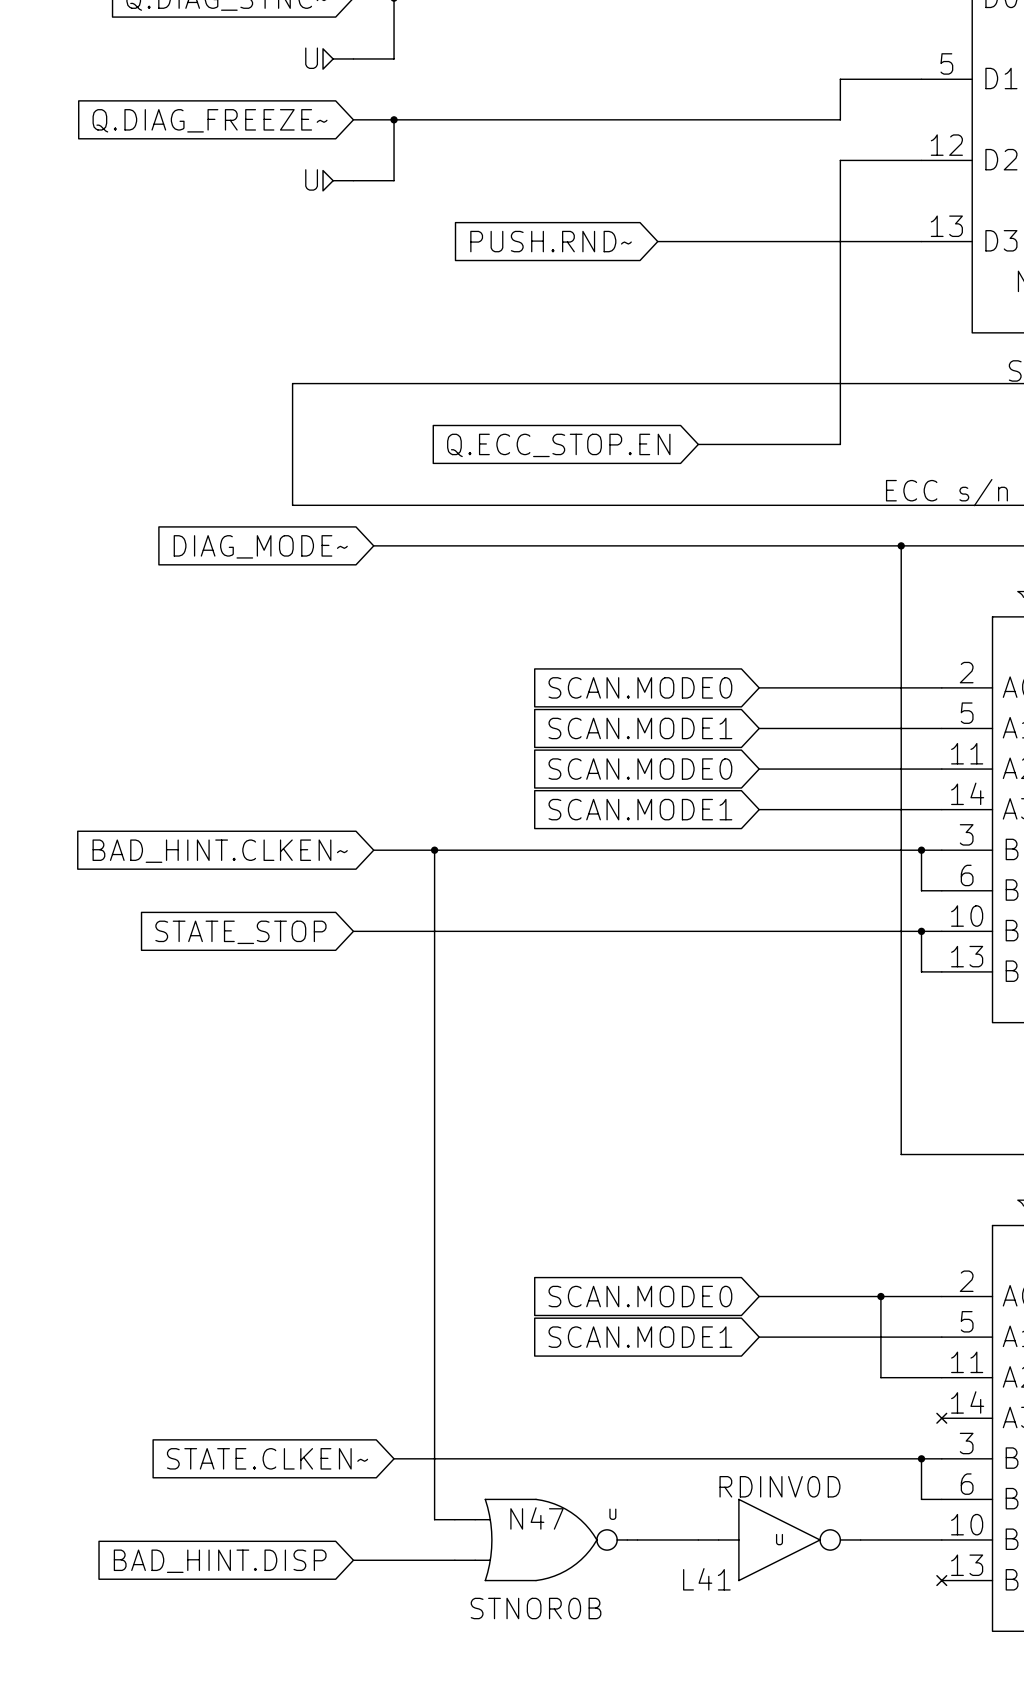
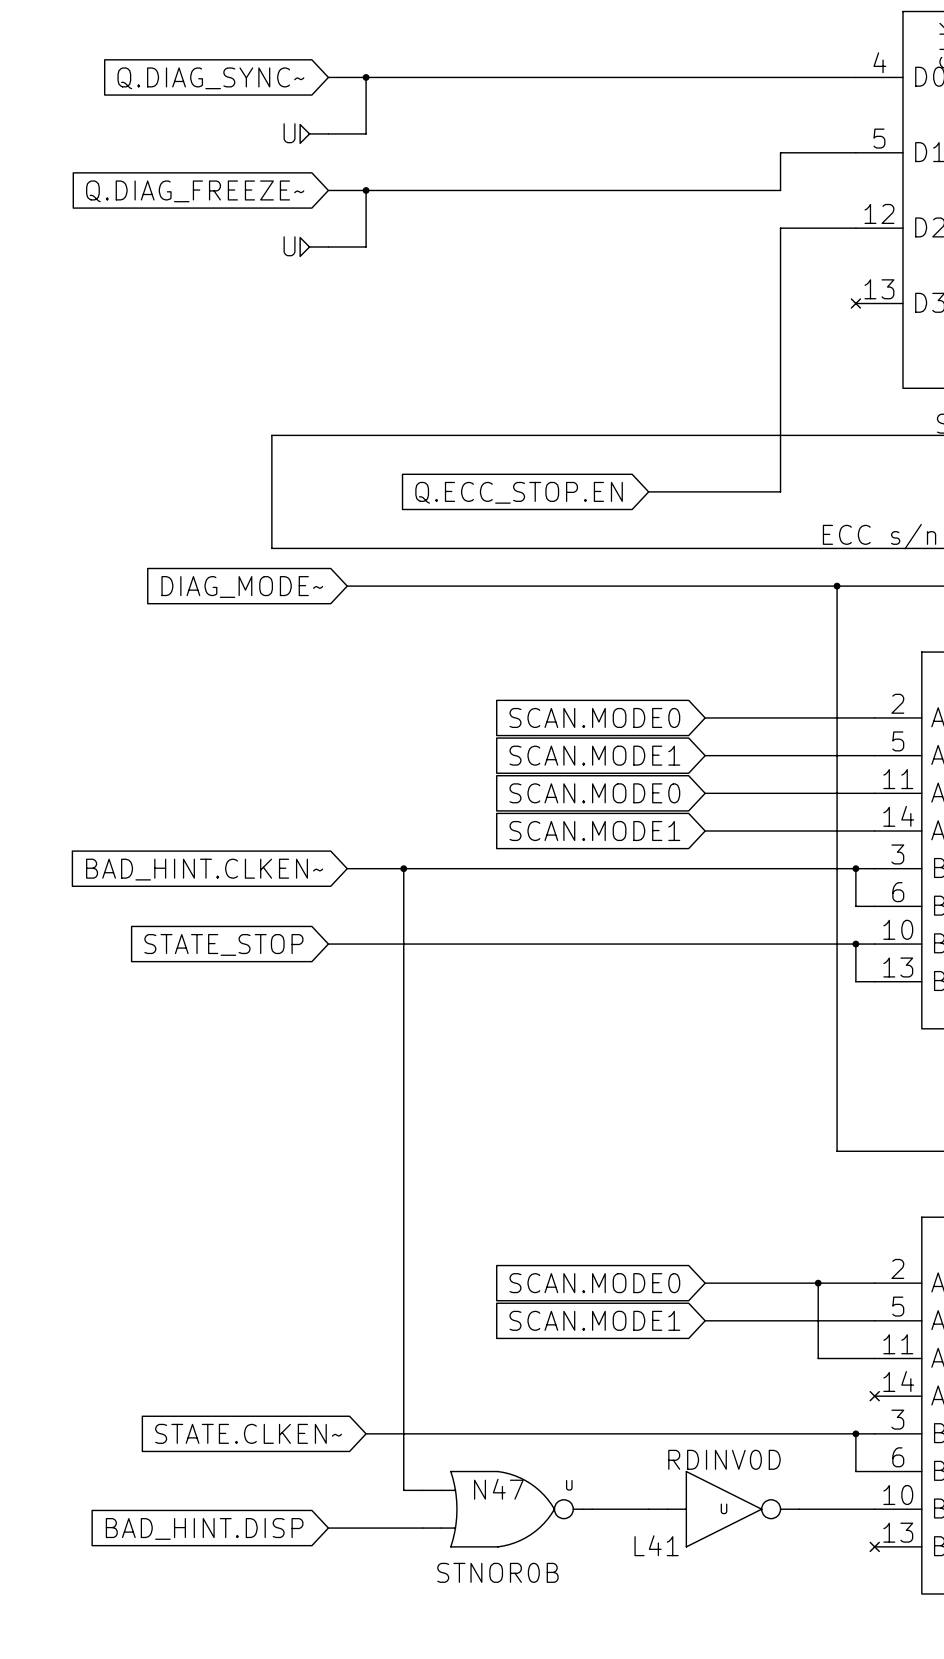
global label: PUSH.RND~ (551, 241) -> none
wire: (657, 241) (921, 241) -> none
no-connect mark: none -> (855, 303)

